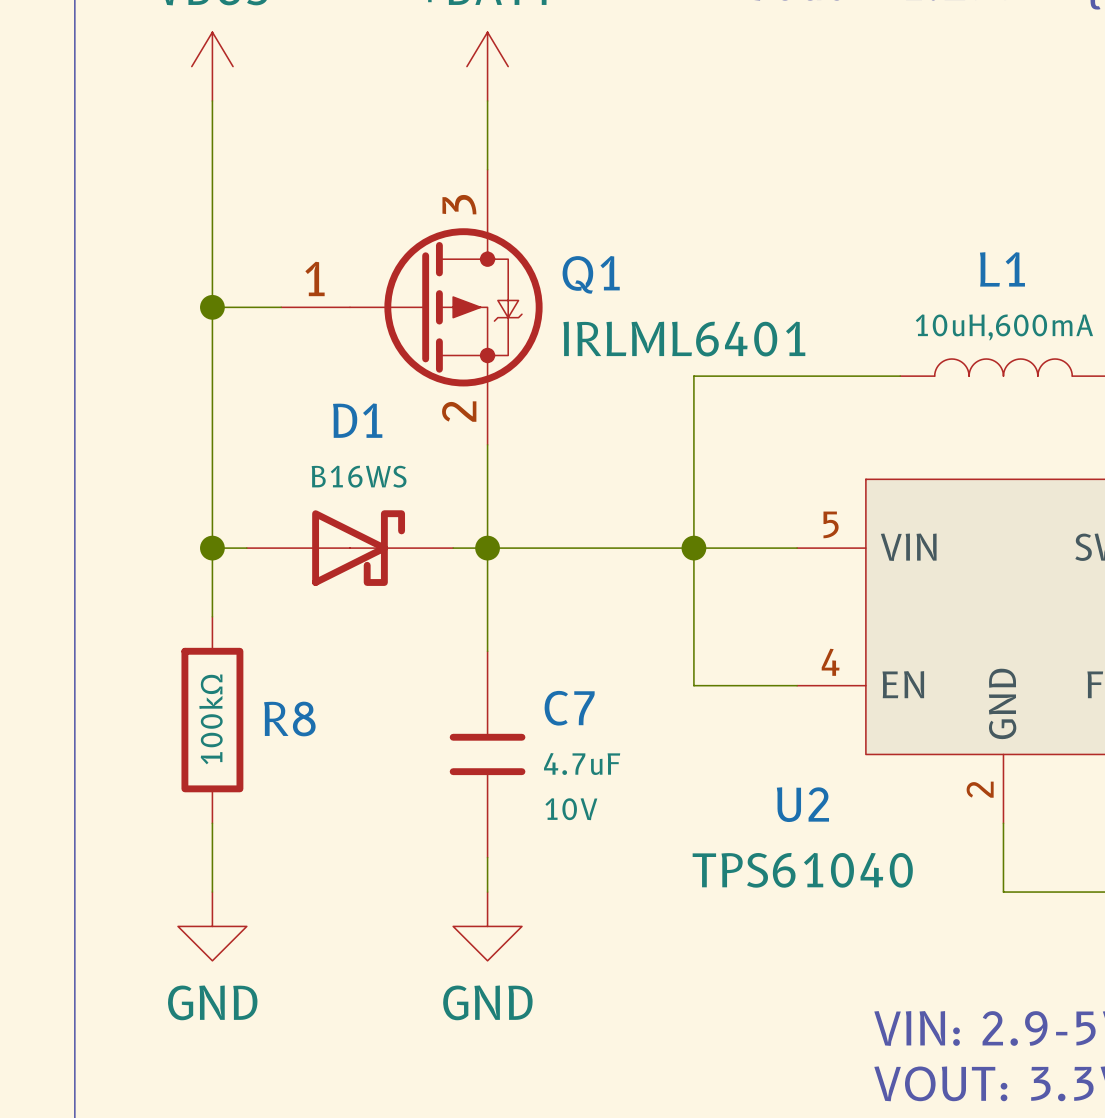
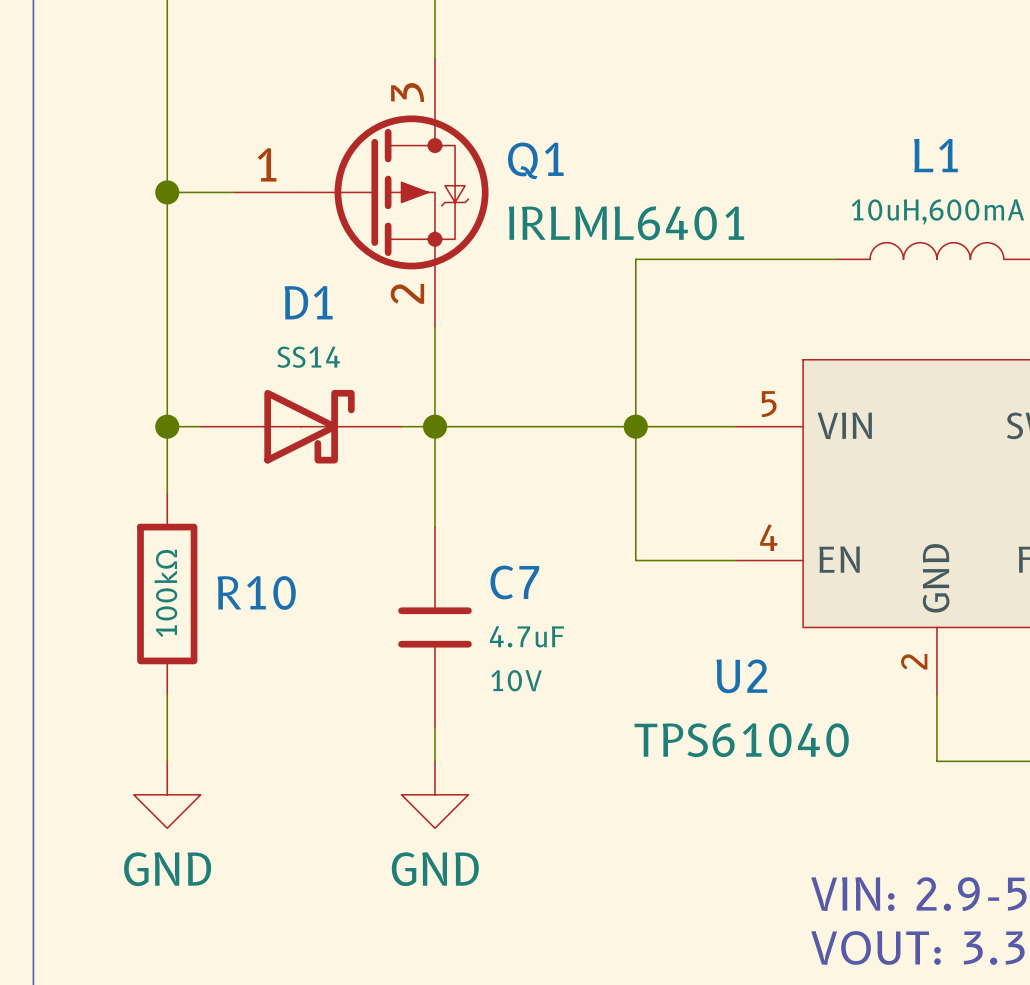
D1 value: B16WS (359, 476) -> SS14 (308, 357)
R8 name: R8 (289, 719) -> R10 (256, 592)

